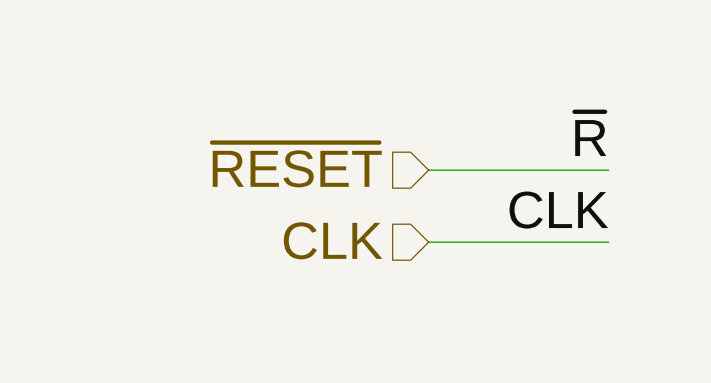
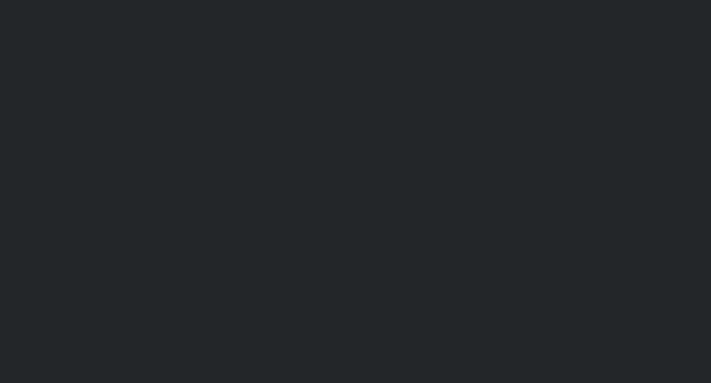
label: ~{R} (590, 133) -> none
hierarchical label: ~{RESET} (296, 164) -> none
wire: (428, 170) (608, 170) -> none
label: CLK (558, 210) -> none
hierarchical label: CLK (333, 240) -> none
wire: (428, 242) (608, 242) -> none

